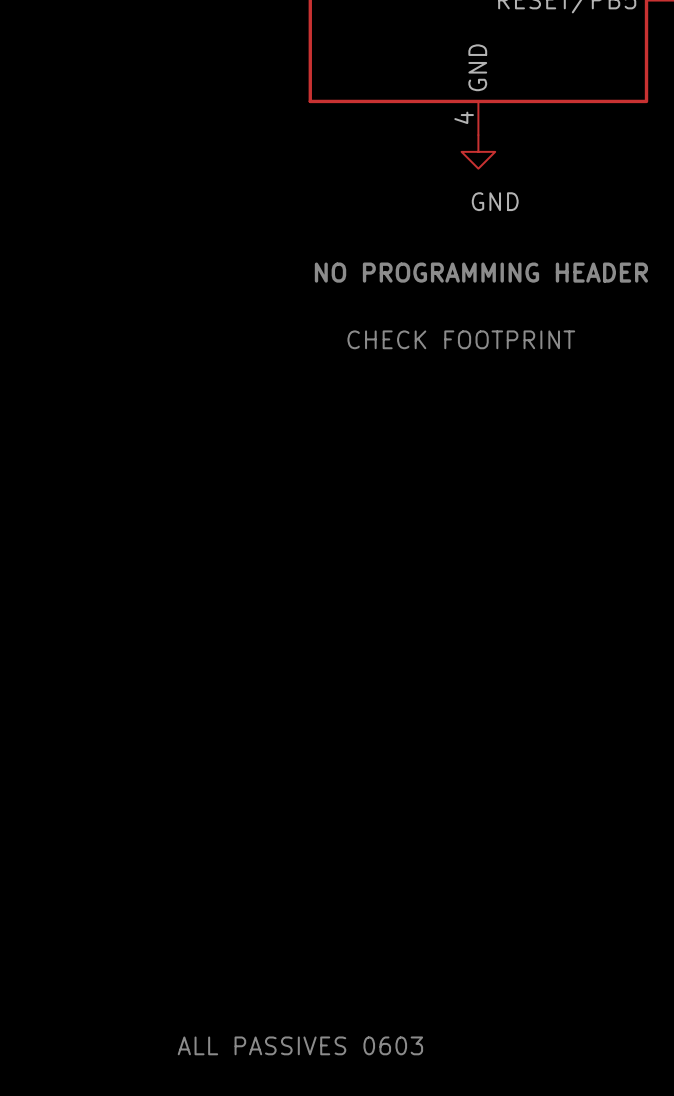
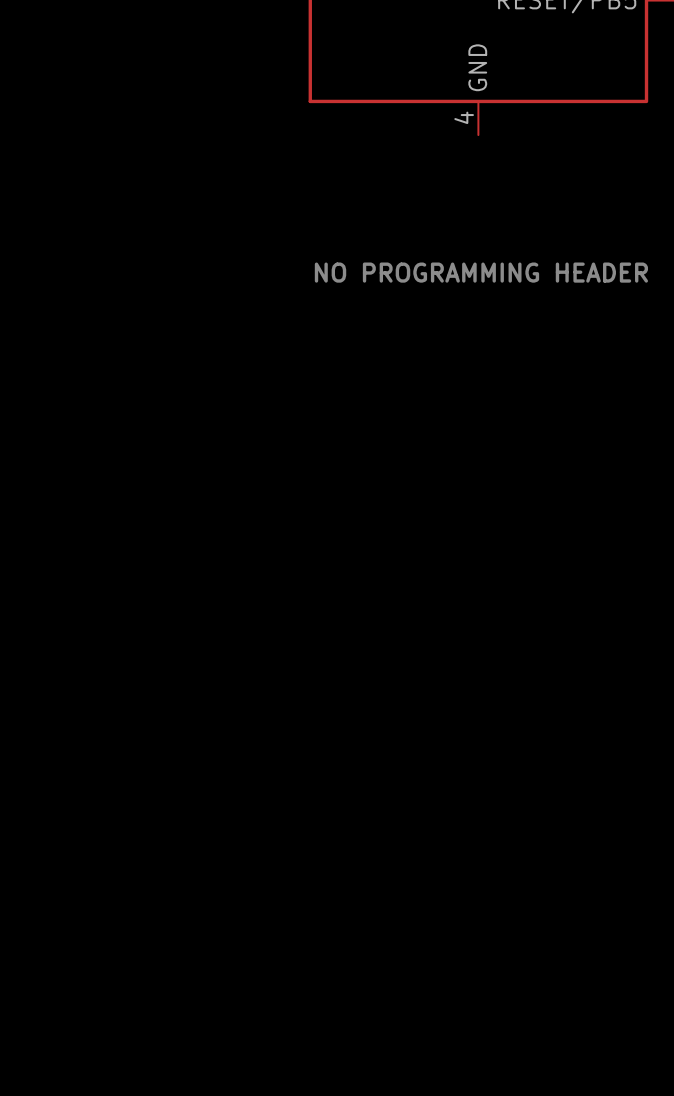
power symbol: GND (478, 151) -> none
text: CHECK FOOTPRINT (461, 339) -> none
text: ALL PASSIVES 0603 (300, 1045) -> none

